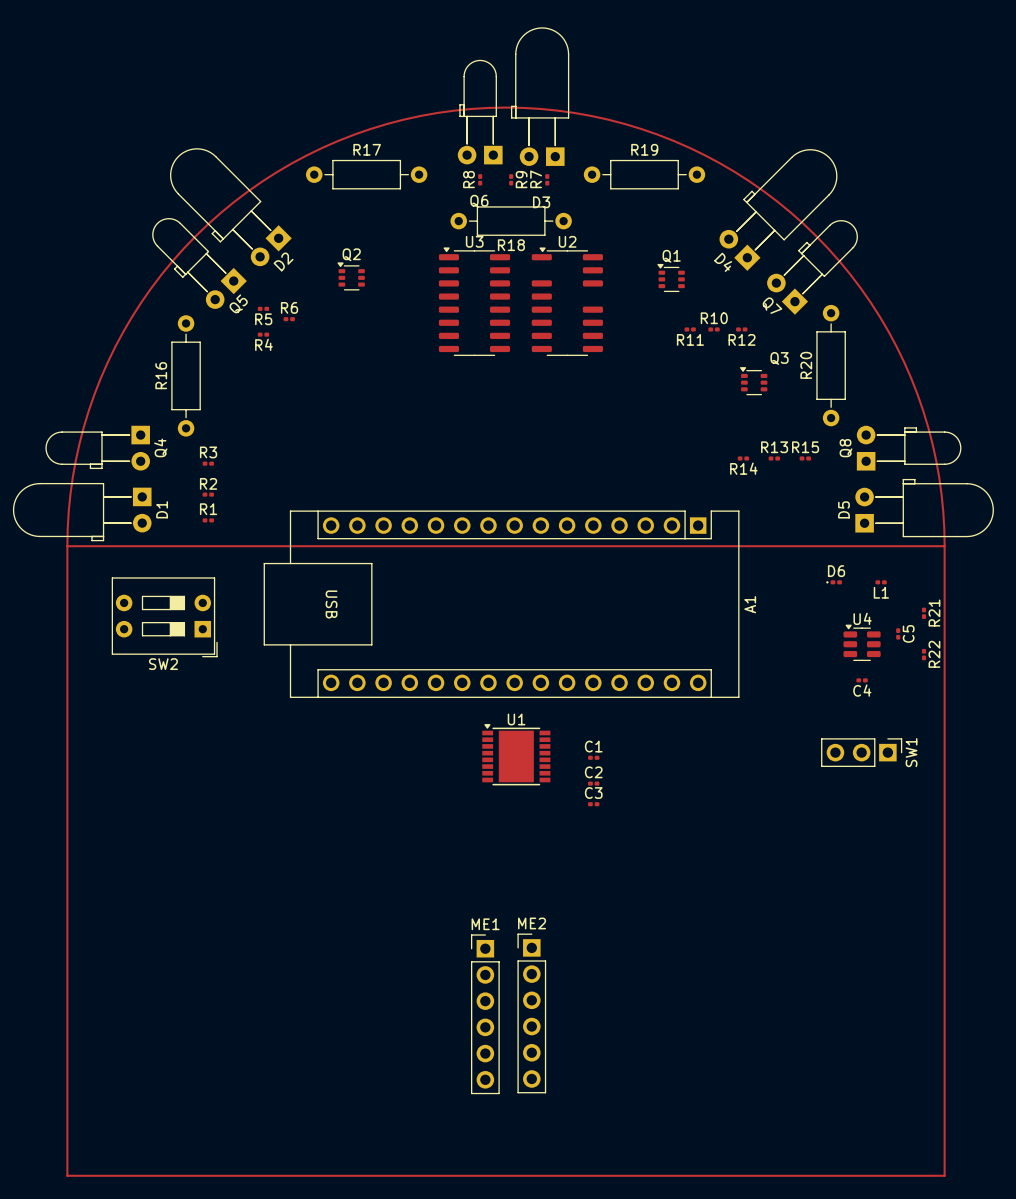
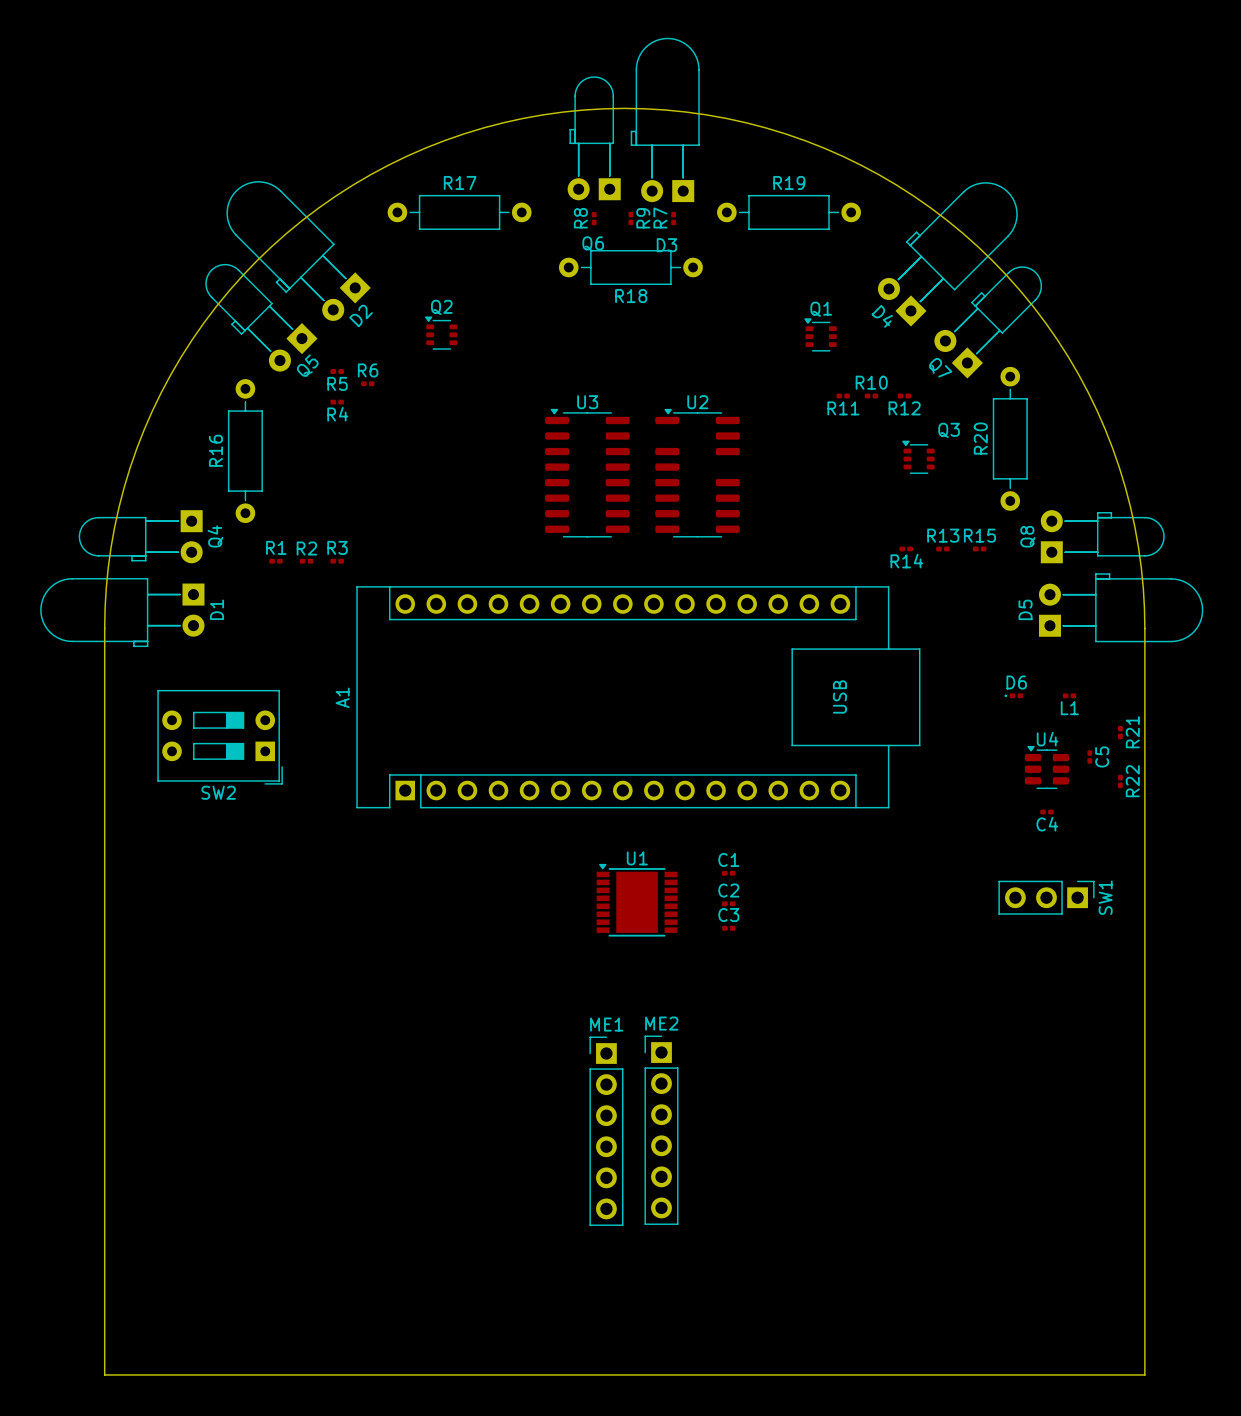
U3 position: (474, 301) -> (587, 473)
U2 position: (567, 301) -> (697, 473)
R3 position: (208, 463) -> (337, 561)
R2 position: (208, 494) -> (306, 561)
R1 position: (208, 520) -> (276, 561)
board edge: none -> (104, 628) (104, 1374) (1144, 1374) (1144, 628) (1141, 567) (1134, 527) (1125, 487) (1105, 429) (1078, 374) (1057, 339) (1033, 306) (1006, 275) (977, 246) (930, 207) (878, 174) (842, 156) (804, 140) (765, 127) (726, 118) (665, 110) (624, 108) (583, 110) (523, 118) (483, 127) (444, 140) (388, 165) (353, 185) (319, 207) (271, 246) (229, 290) (204, 322) (181, 356) (161, 392) (144, 429) (124, 487) (114, 527) (108, 567) (104, 628)
top track: (67, 546) (944, 546) -> none
top track: (67, 546) (67, 1175) (944, 1175) (944, 546) -> none
top track: (67, 546) (70, 494) (75, 460) (83, 427) (100, 378) (123, 331) (141, 302) (172, 261) (195, 236) (221, 212) (262, 181) (306, 155) (338, 140) (386, 124) (420, 116) (454, 110) (506, 107) (540, 108) (591, 116) (641, 129) (673, 140) (720, 163) (749, 181) (777, 201) (816, 236) (839, 261) (870, 302) (888, 331) (911, 378) (928, 427) (936, 460) (941, 494) (944, 546) -> none
A1 rotation: 0° (501, 604) -> 180° (638, 697)
C1: none -> (728, 873)
C1 name: C1 (593, 746) -> C2 (728, 890)
C2: (593, 783) -> none
C3 position: (593, 804) -> (728, 928)
ME2 position: (531, 1013) -> (661, 1130)
ME1 position: (485, 1014) -> (606, 1131)

